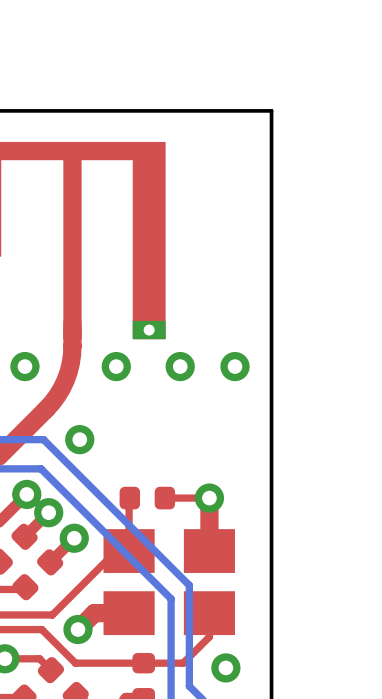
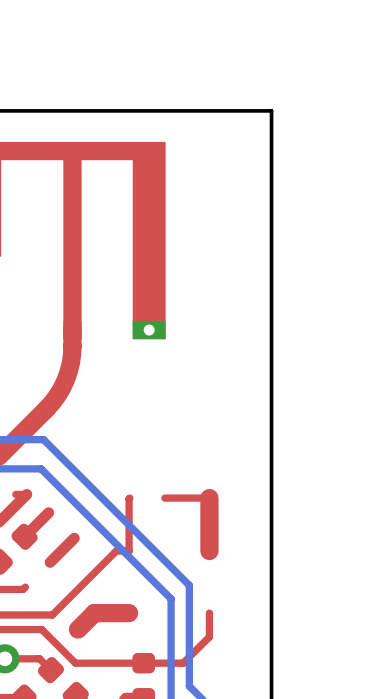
via: (24, 366) -> none
via: (116, 366) -> none
via: (180, 366) -> none
via: (235, 366) -> none
via: (79, 439) -> none
via: (26, 494) -> none
part: (147, 498) -> none
via: (209, 498) -> none
via: (48, 512) -> none
via: (74, 538) -> none
part: (37, 574) -> none
part: (169, 582) -> none
via: (77, 629) -> none
via: (225, 667) -> none

